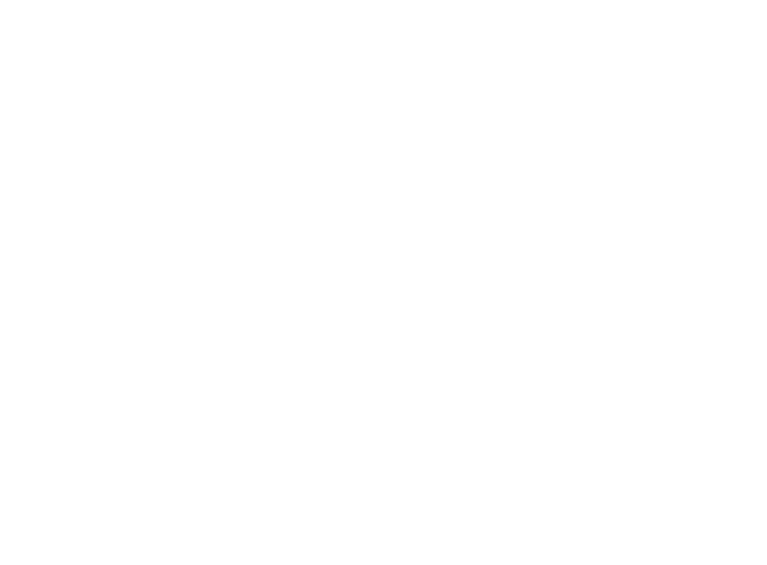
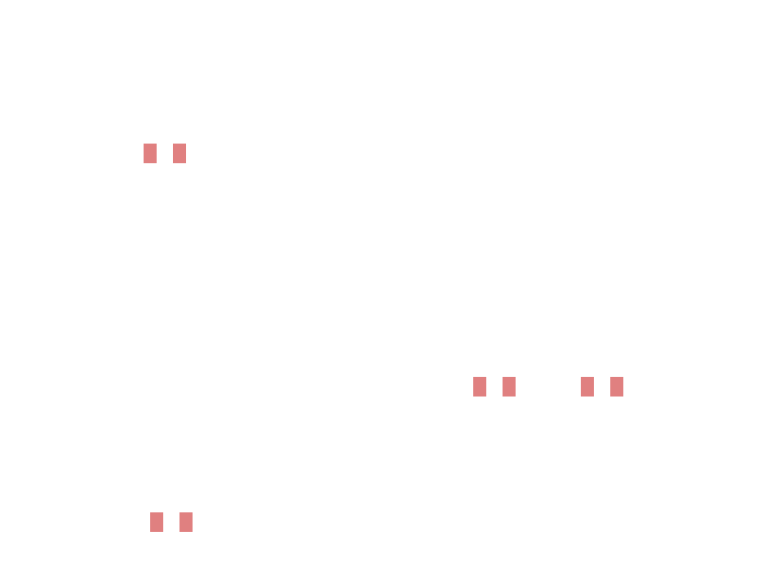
part: none -> (164, 153)
part: none -> (494, 386)
part: none -> (602, 386)
part: none -> (171, 522)

